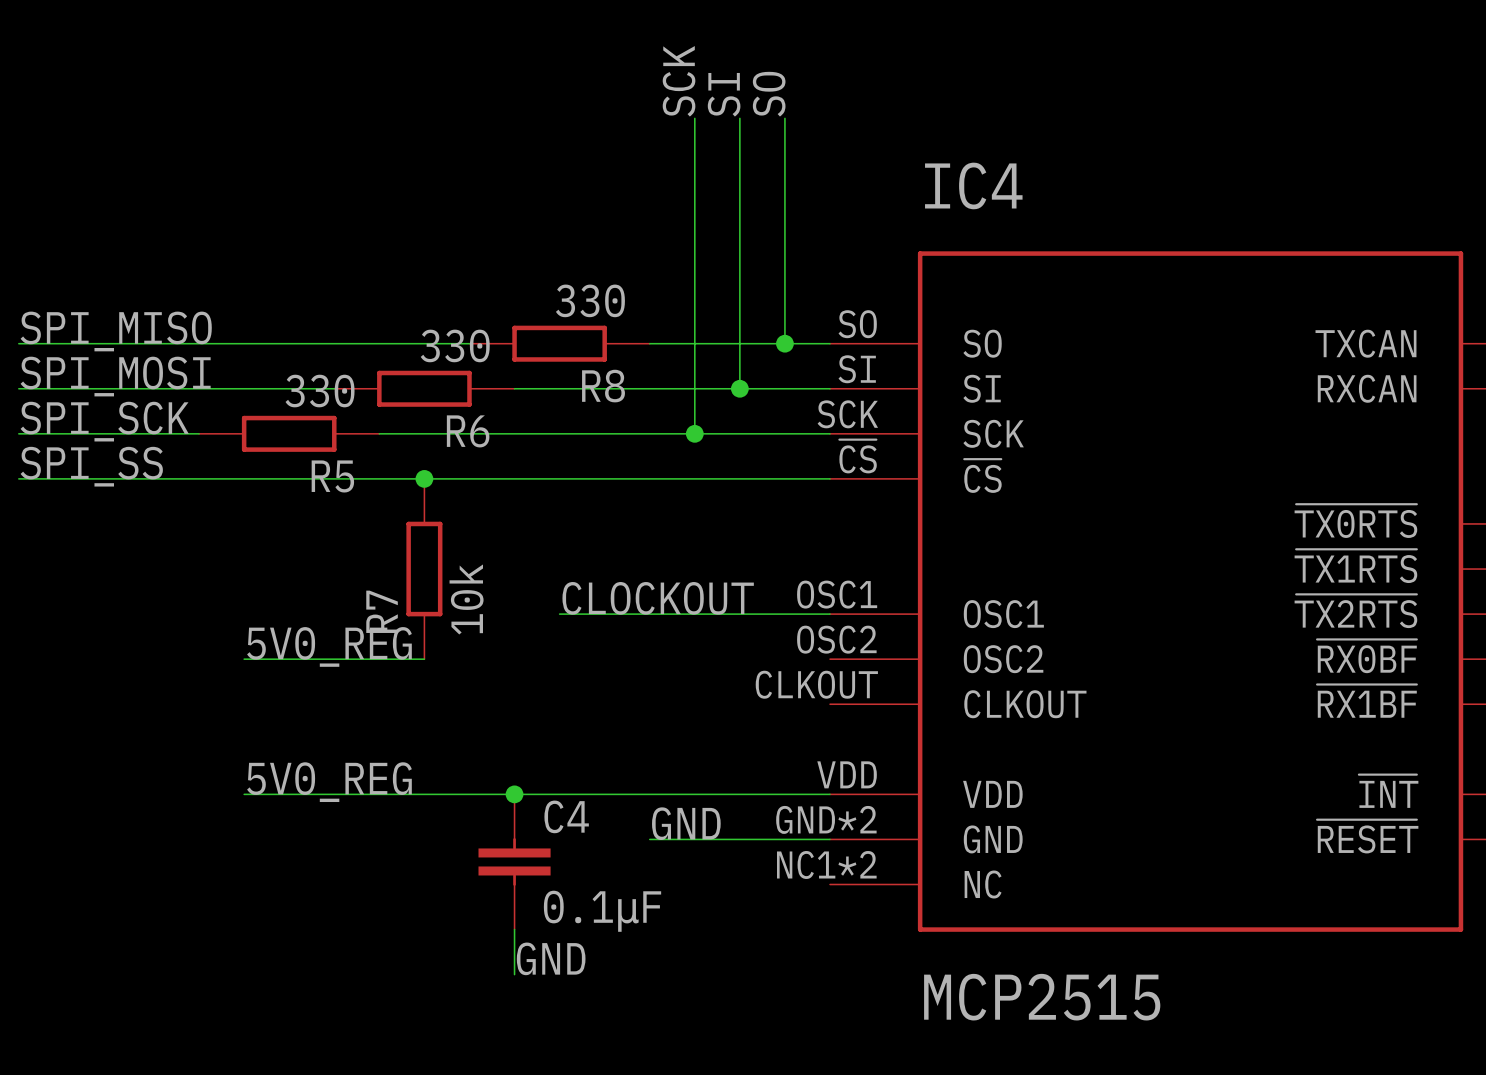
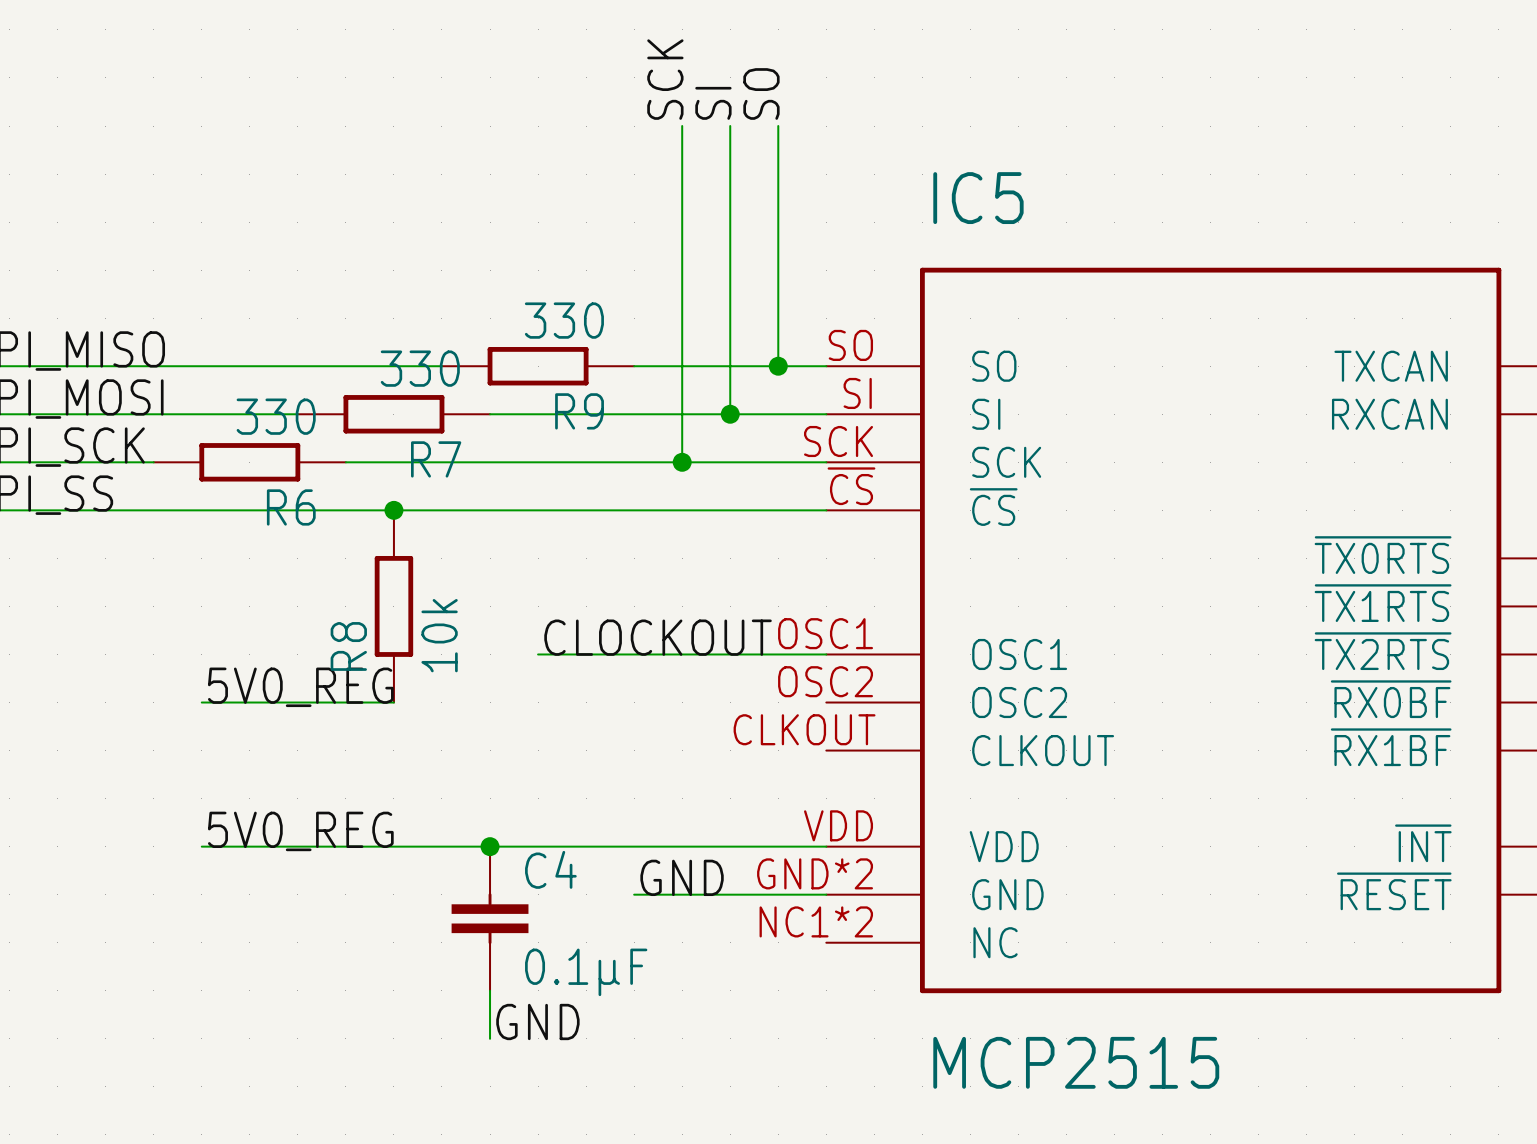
IC4 name: IC4 (973, 185) -> IC5 (978, 198)
R8 name: R8 (603, 386) -> R9 (579, 411)
R6 name: R6 (468, 431) -> R7 (436, 459)
R5 name: R5 (332, 476) -> R6 (291, 507)
R7 name: R7 (382, 611) -> R8 (348, 646)

